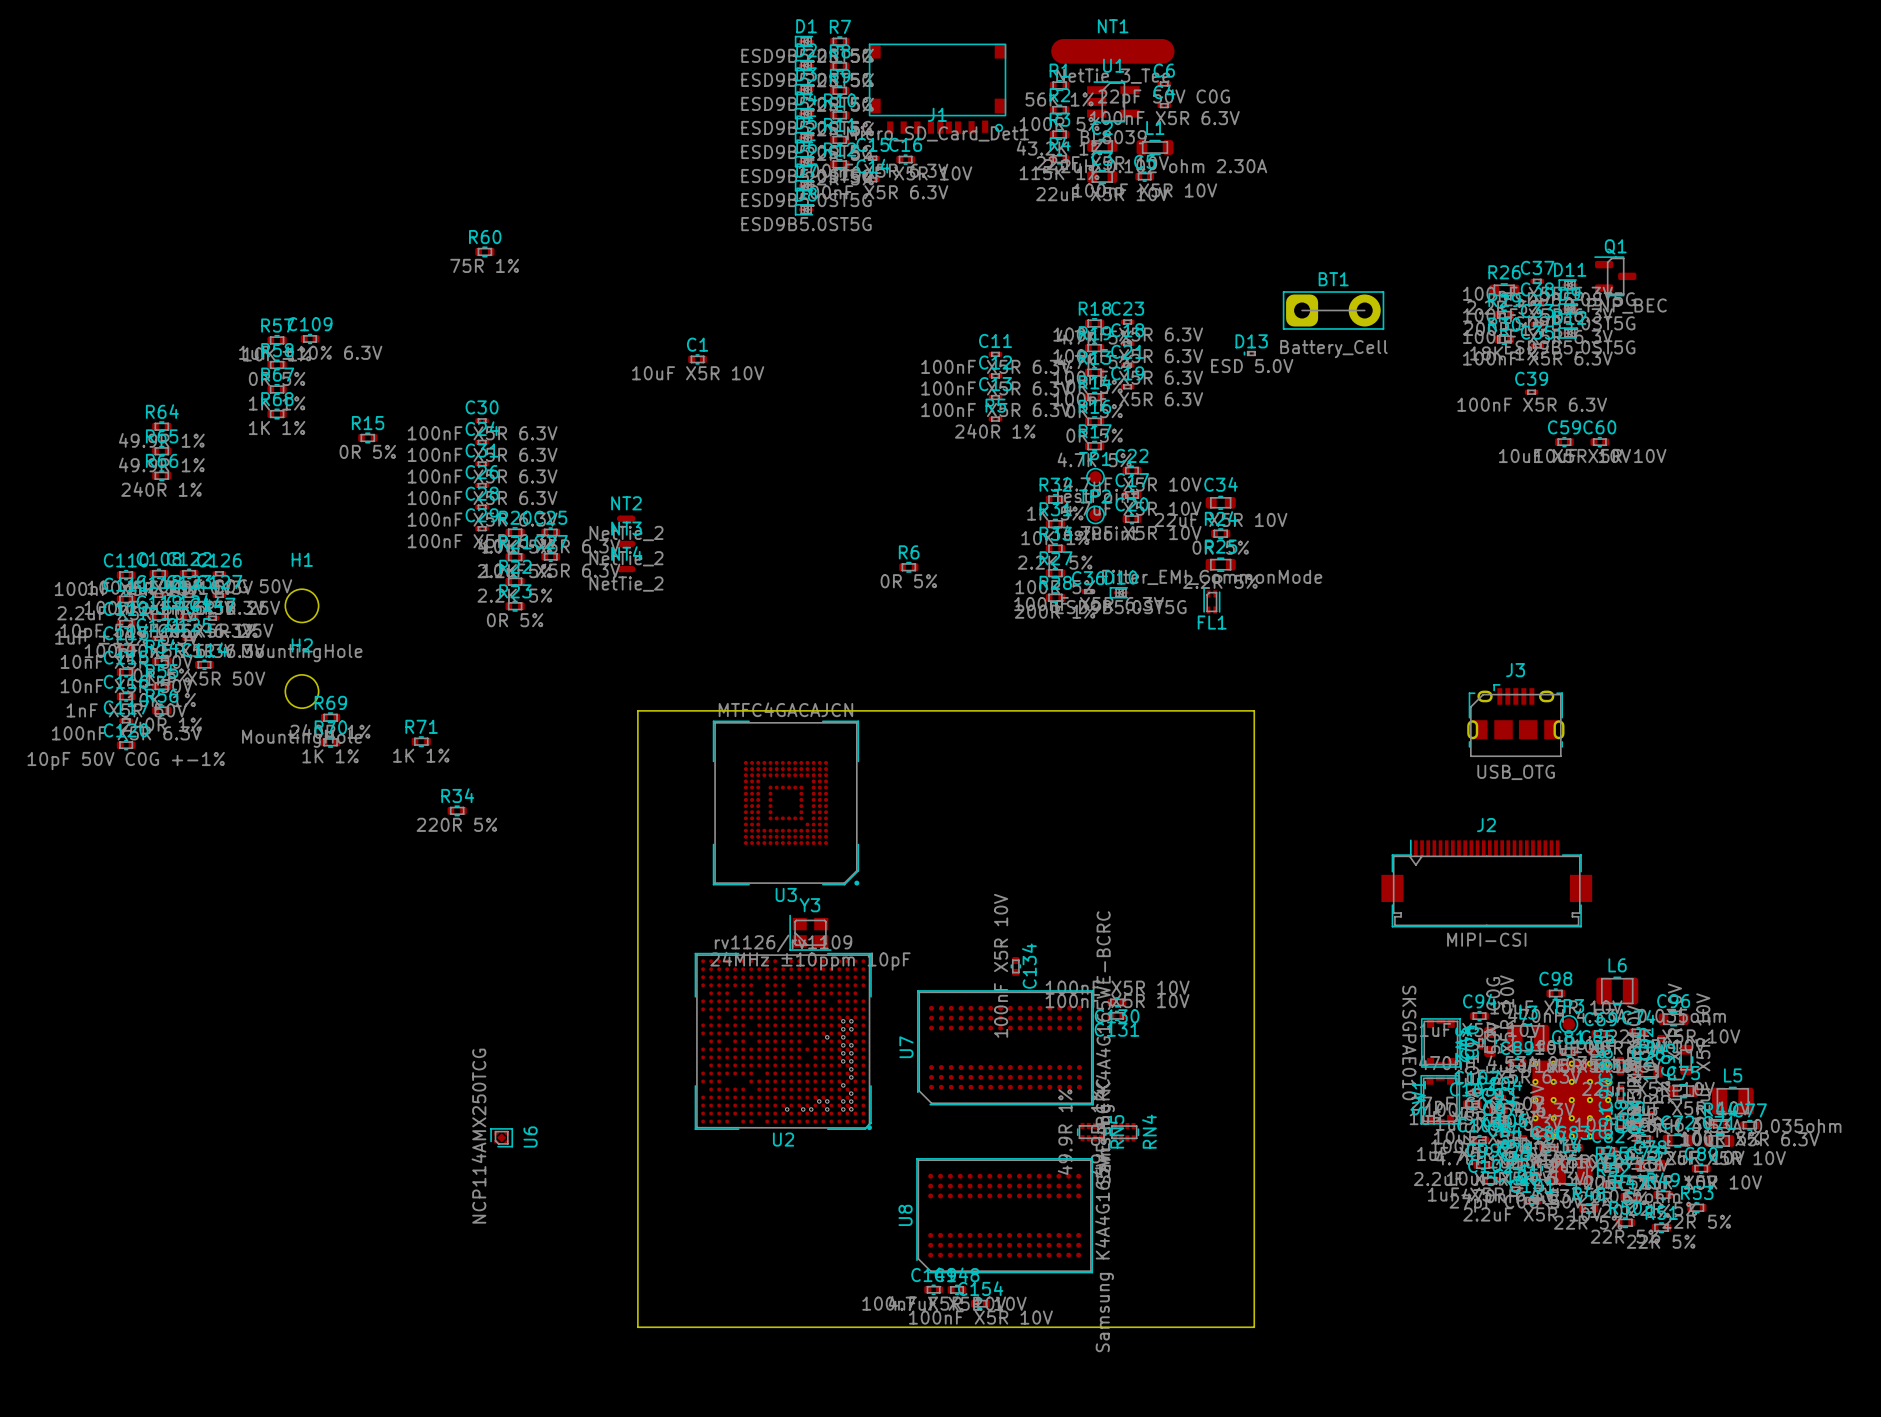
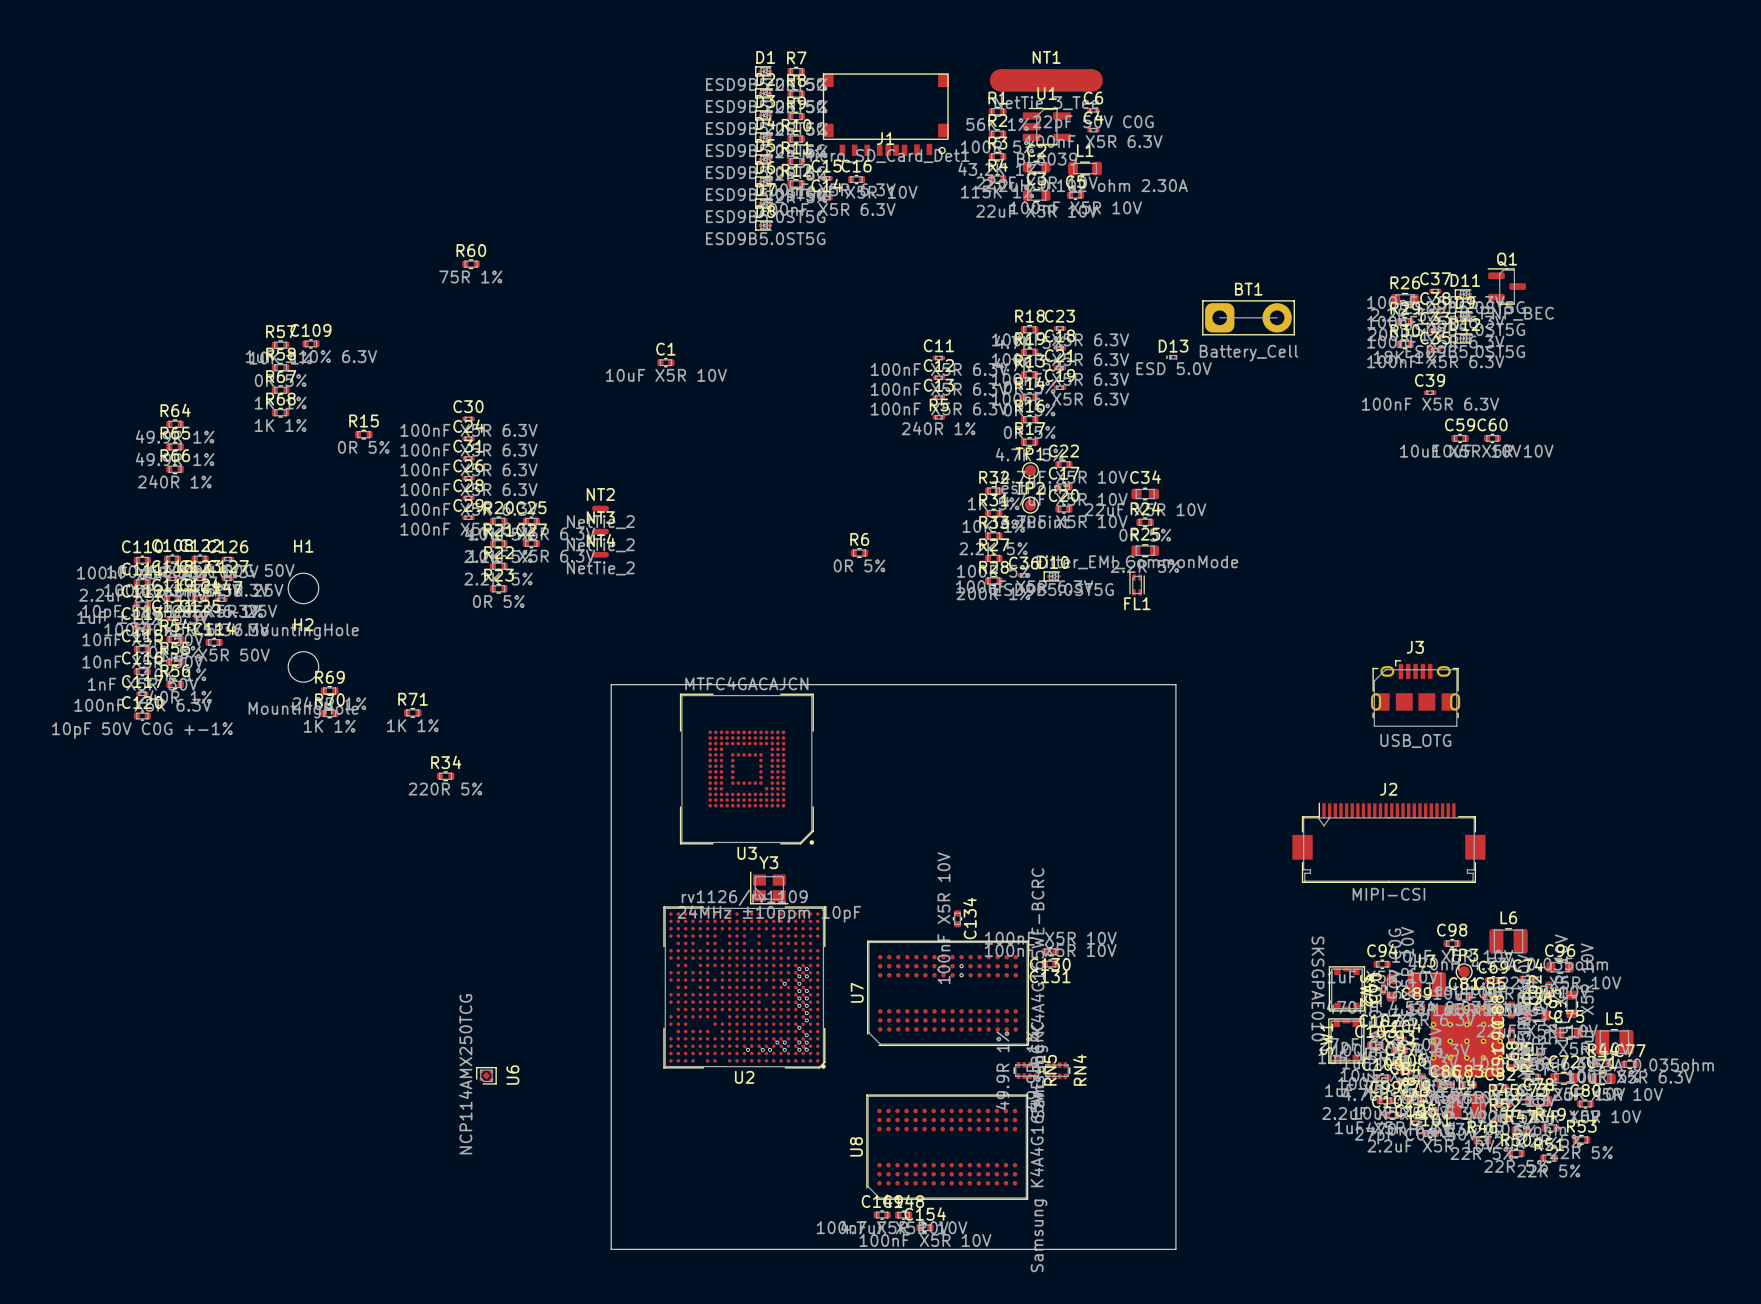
via: none -> (961, 966)
via: none -> (961, 975)

